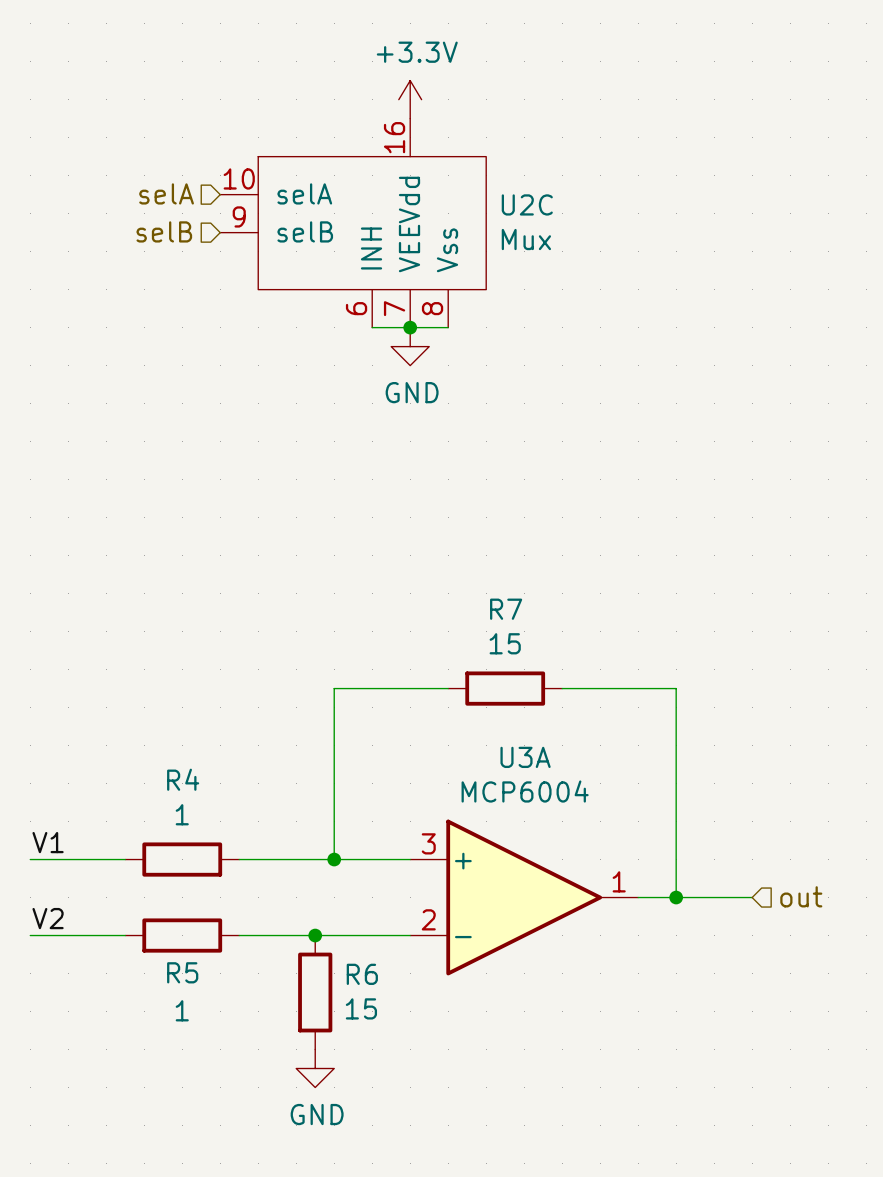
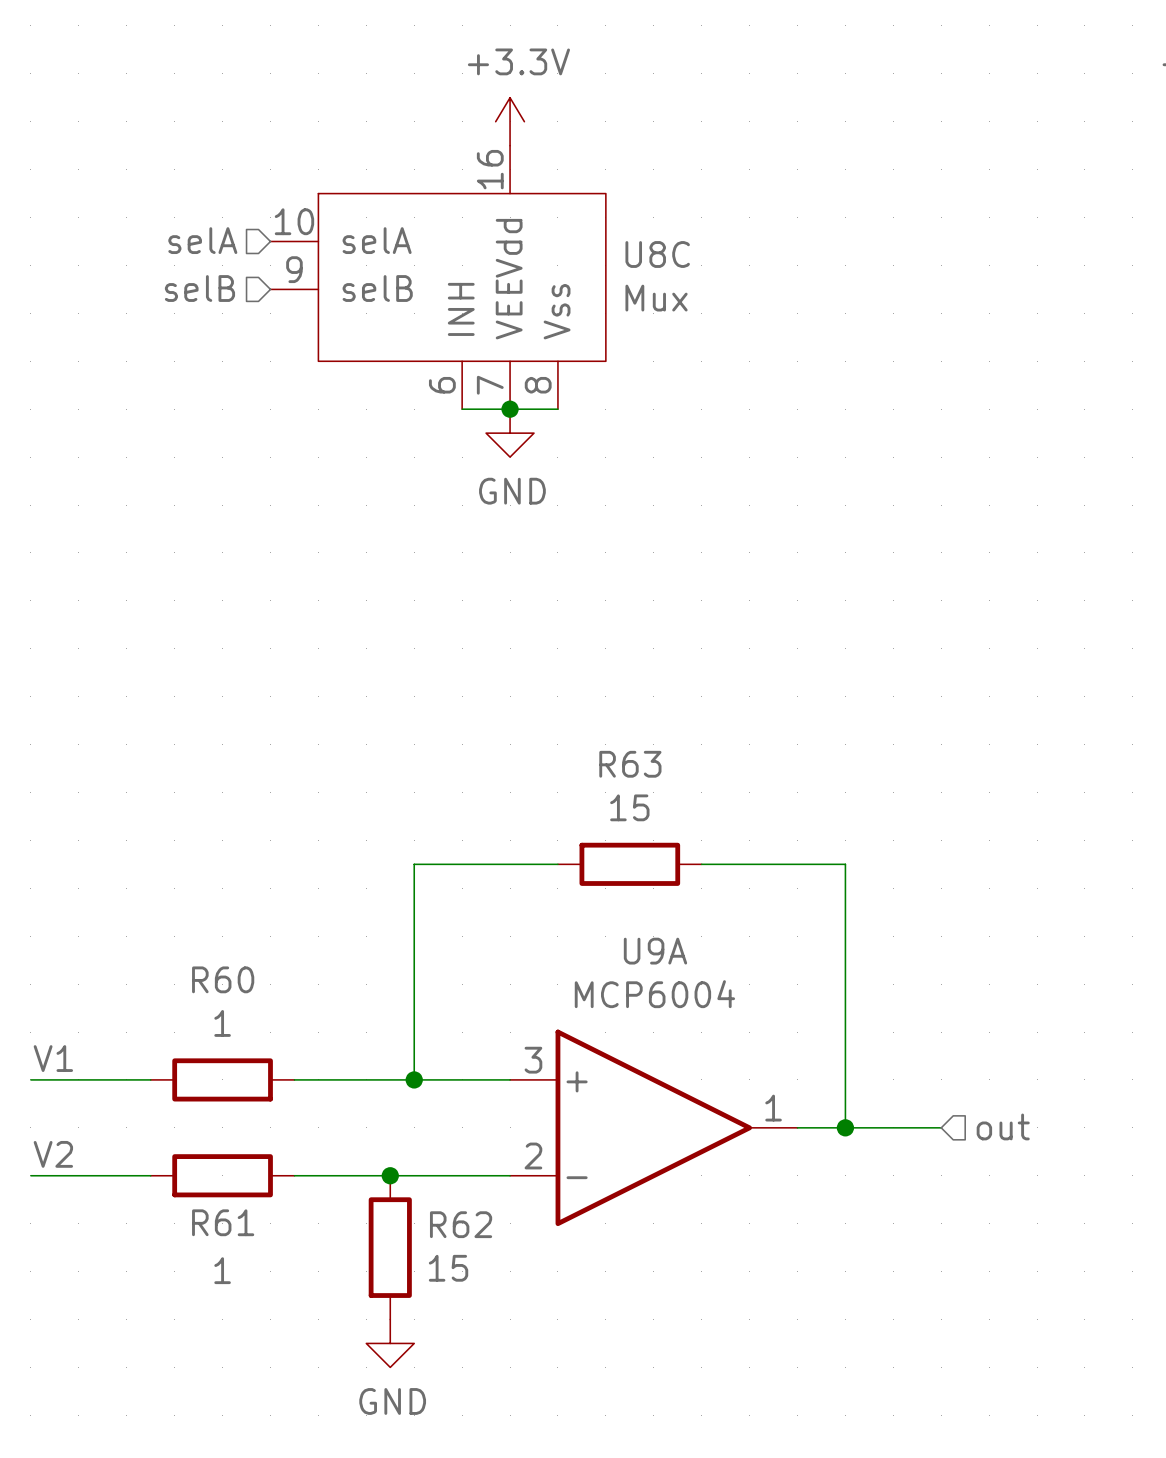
U2C name: U2C (527, 204) -> U8C (657, 254)
R7 name: R7 (506, 609) -> R63 (630, 764)
U3A name: U3A (525, 757) -> U9A (655, 951)
R4 name: R4 (183, 779) -> R60 (223, 979)
R5 name: R5 (182, 972) -> R61 (223, 1222)
R6 name: R6 (362, 974) -> R62 (461, 1224)

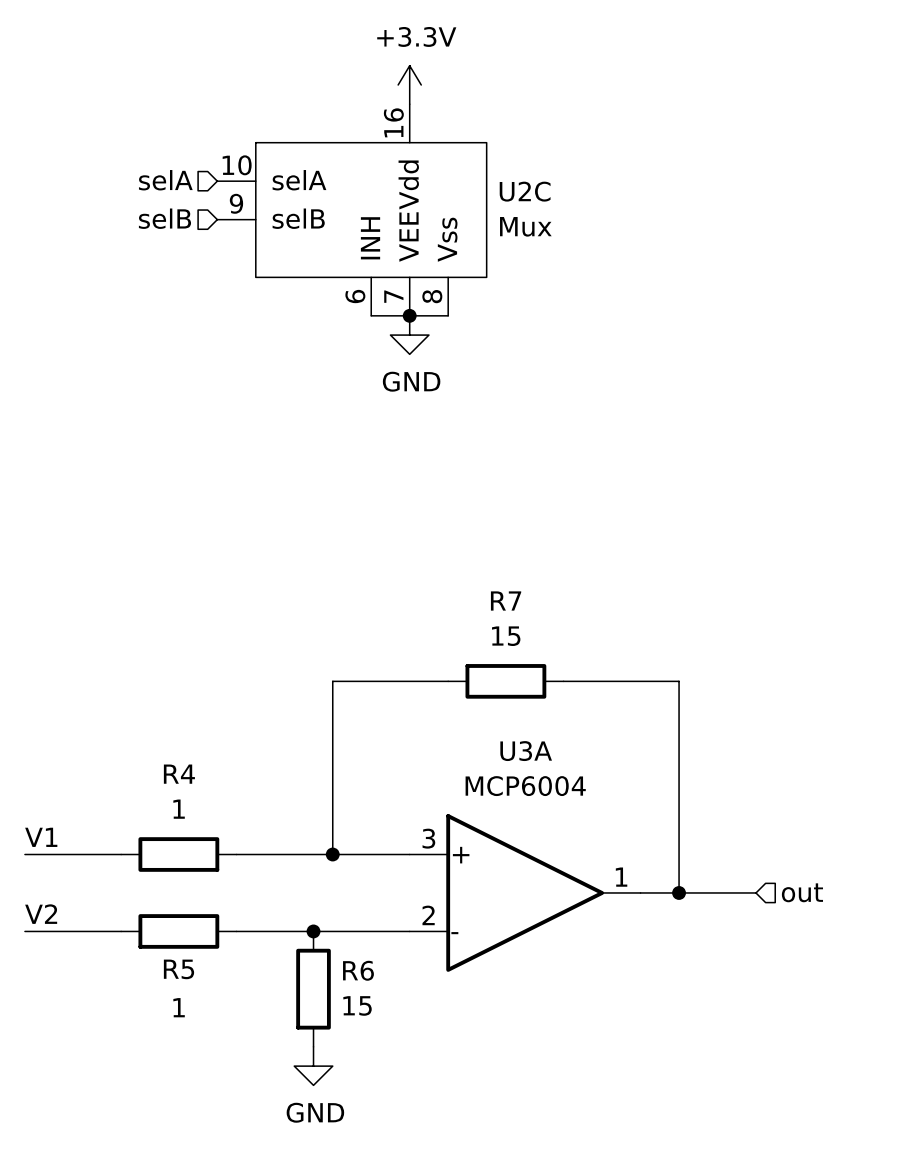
U8C name: U8C (657, 254) -> U2C (525, 191)
R63 name: R63 (630, 764) -> R7 (506, 601)
U9A name: U9A (655, 951) -> U3A (526, 751)
R60 name: R60 (223, 979) -> R4 (179, 774)
R61 name: R61 (223, 1222) -> R5 (178, 969)
R62 name: R62 (461, 1224) -> R6 (358, 970)

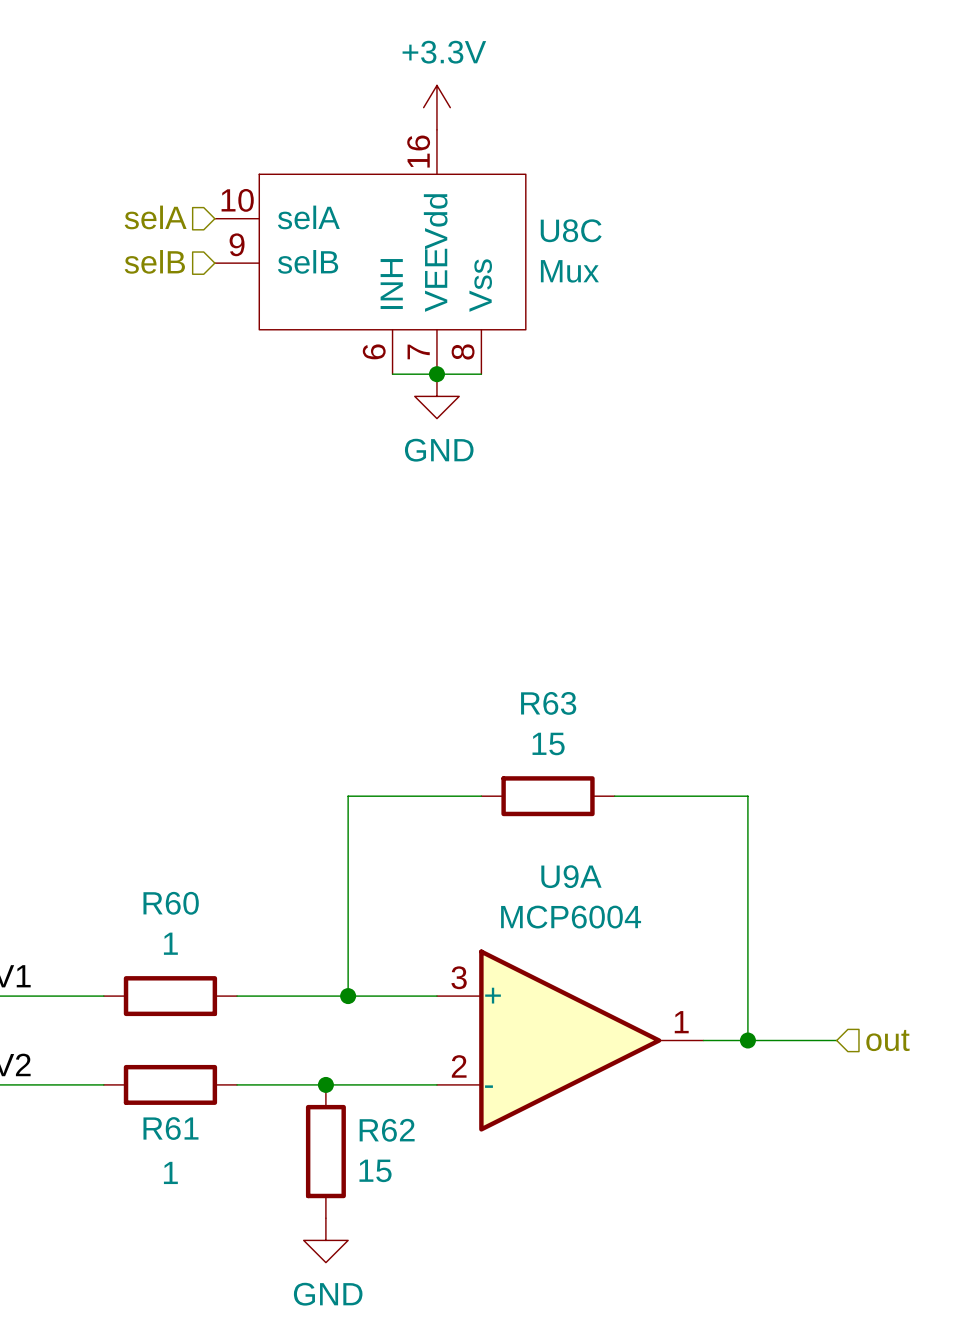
U2C name: U2C (525, 191) -> U8C (571, 230)
R7 name: R7 (506, 601) -> R63 (548, 703)
U3A name: U3A (526, 751) -> U9A (571, 876)
R4 name: R4 (179, 774) -> R60 (171, 903)
R5 name: R5 (178, 969) -> R61 (170, 1128)
R6 name: R6 (358, 970) -> R62 (387, 1130)

